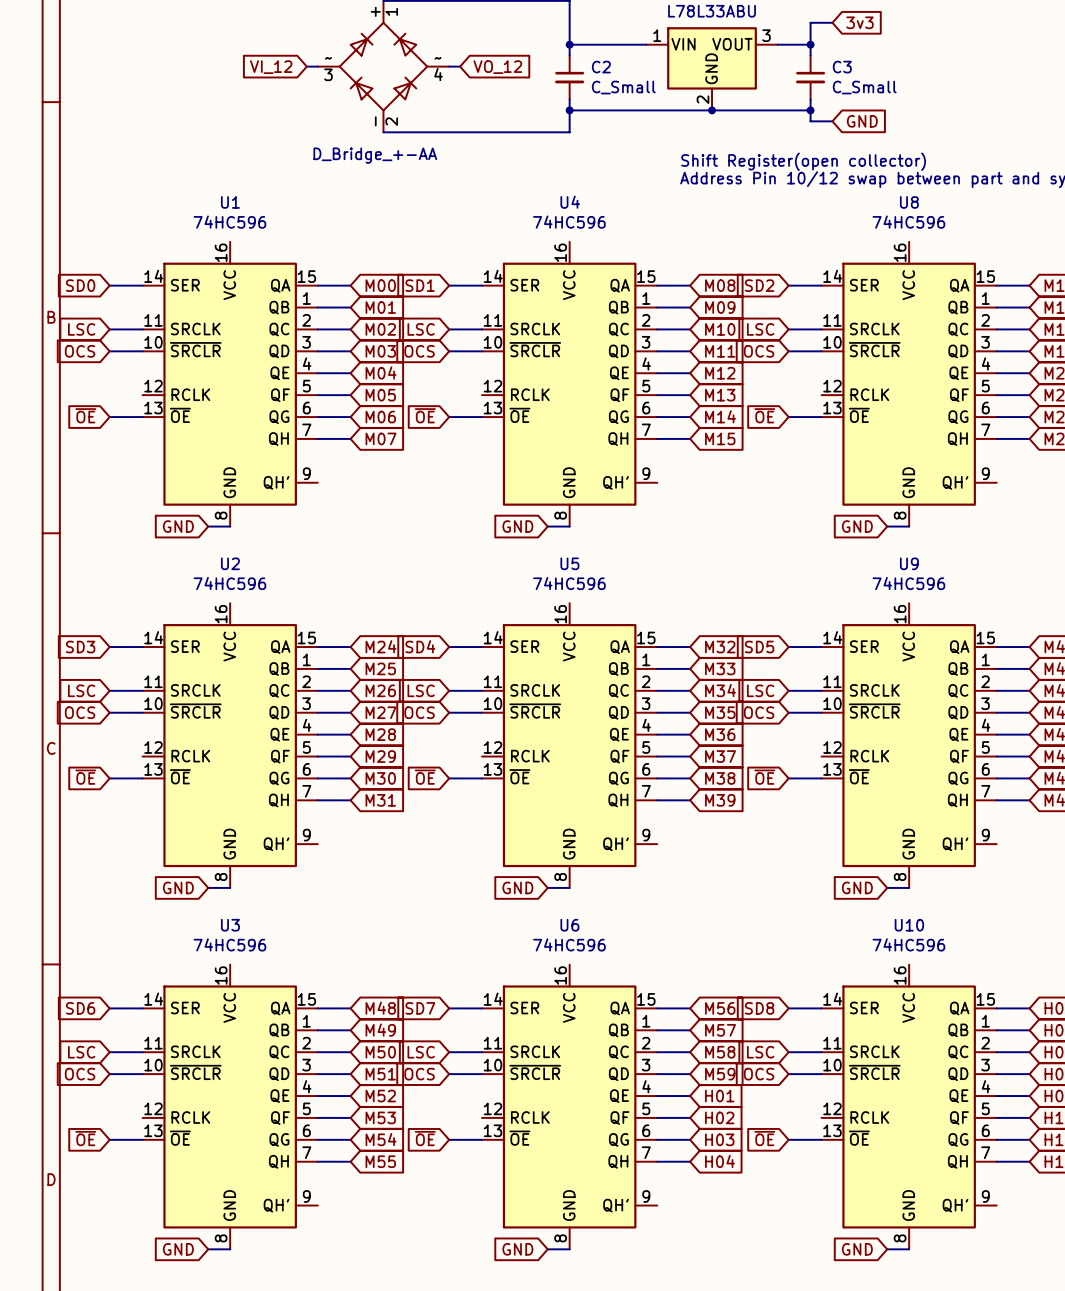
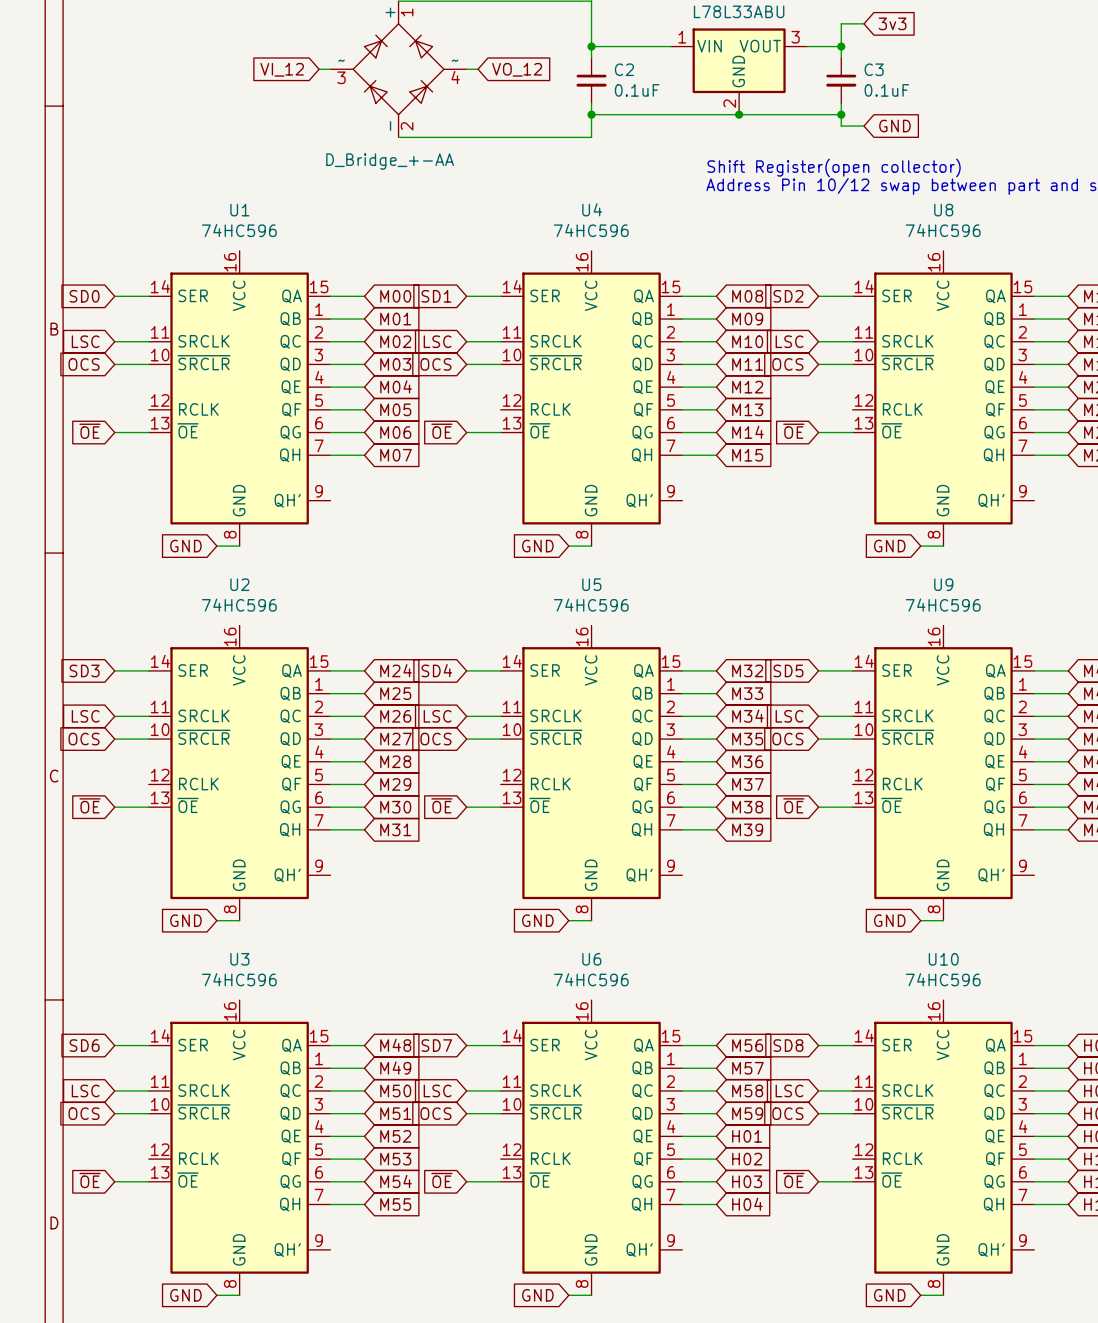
C2 value: C_Small (623, 87) -> 0.1uF (637, 90)
C3 value: C_Small (864, 87) -> 0.1uF (886, 90)

